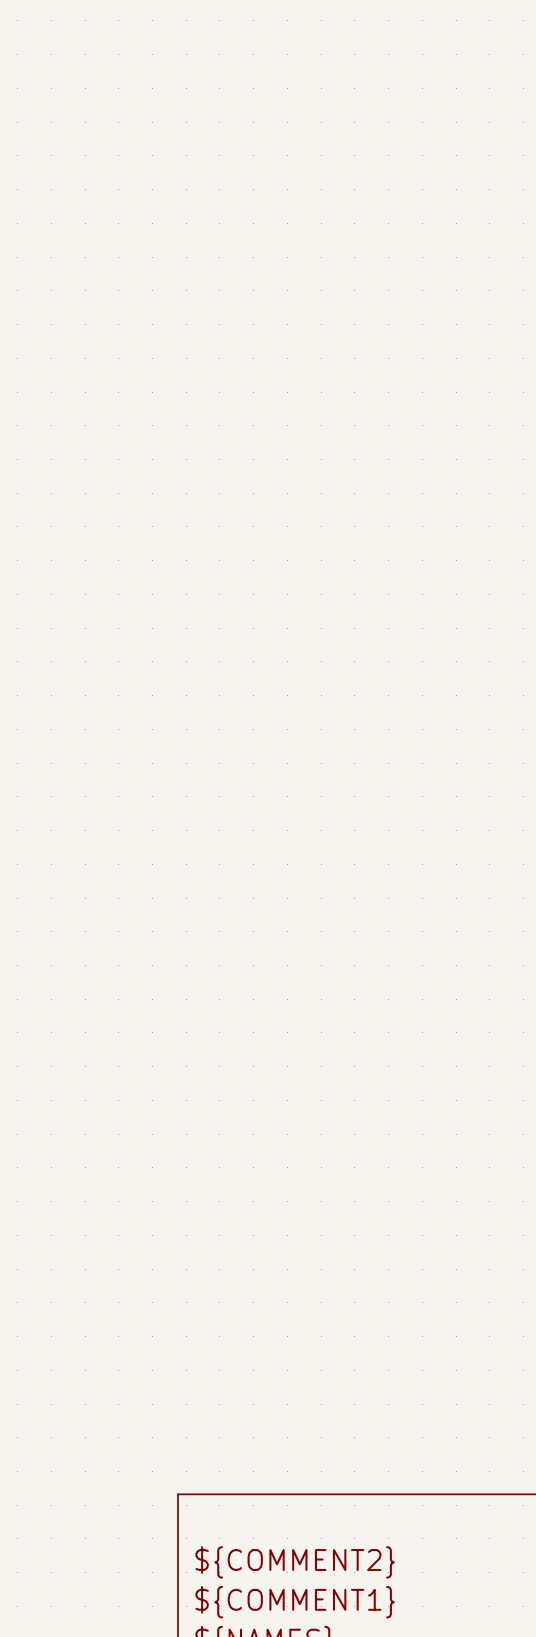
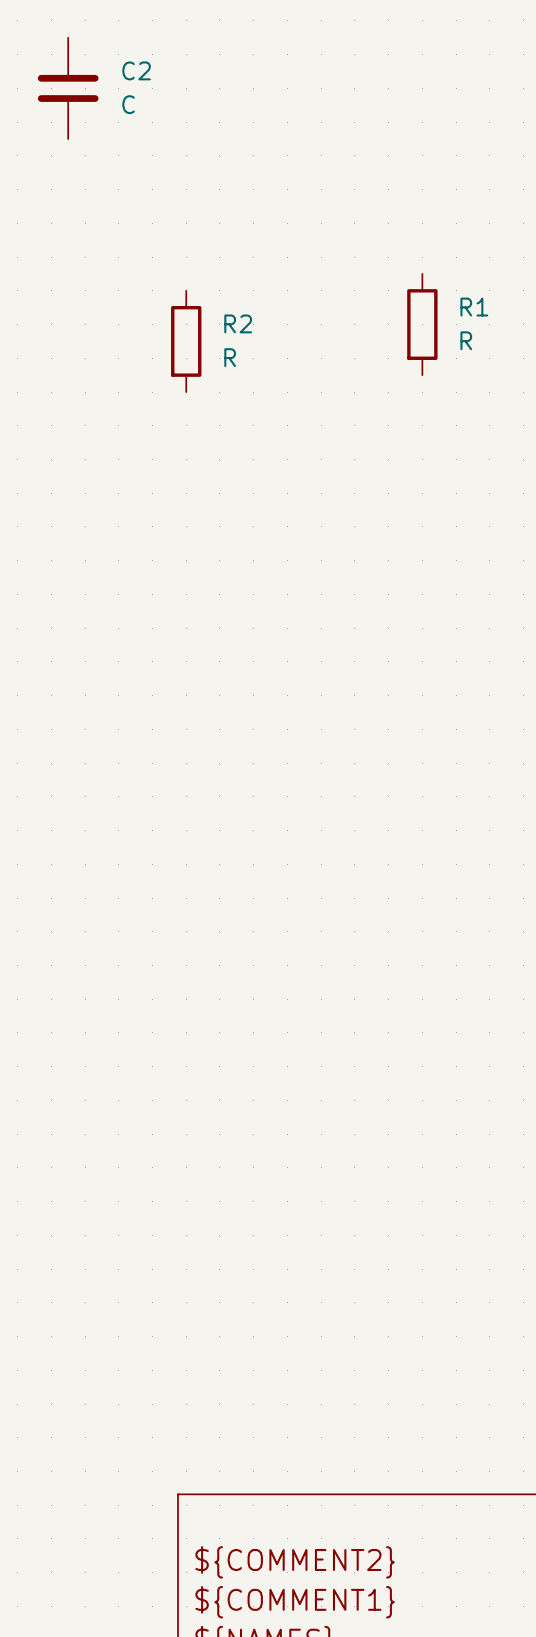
C2: none -> C (68, 88)
R1: none -> R (422, 324)
R2: none -> R (186, 341)

